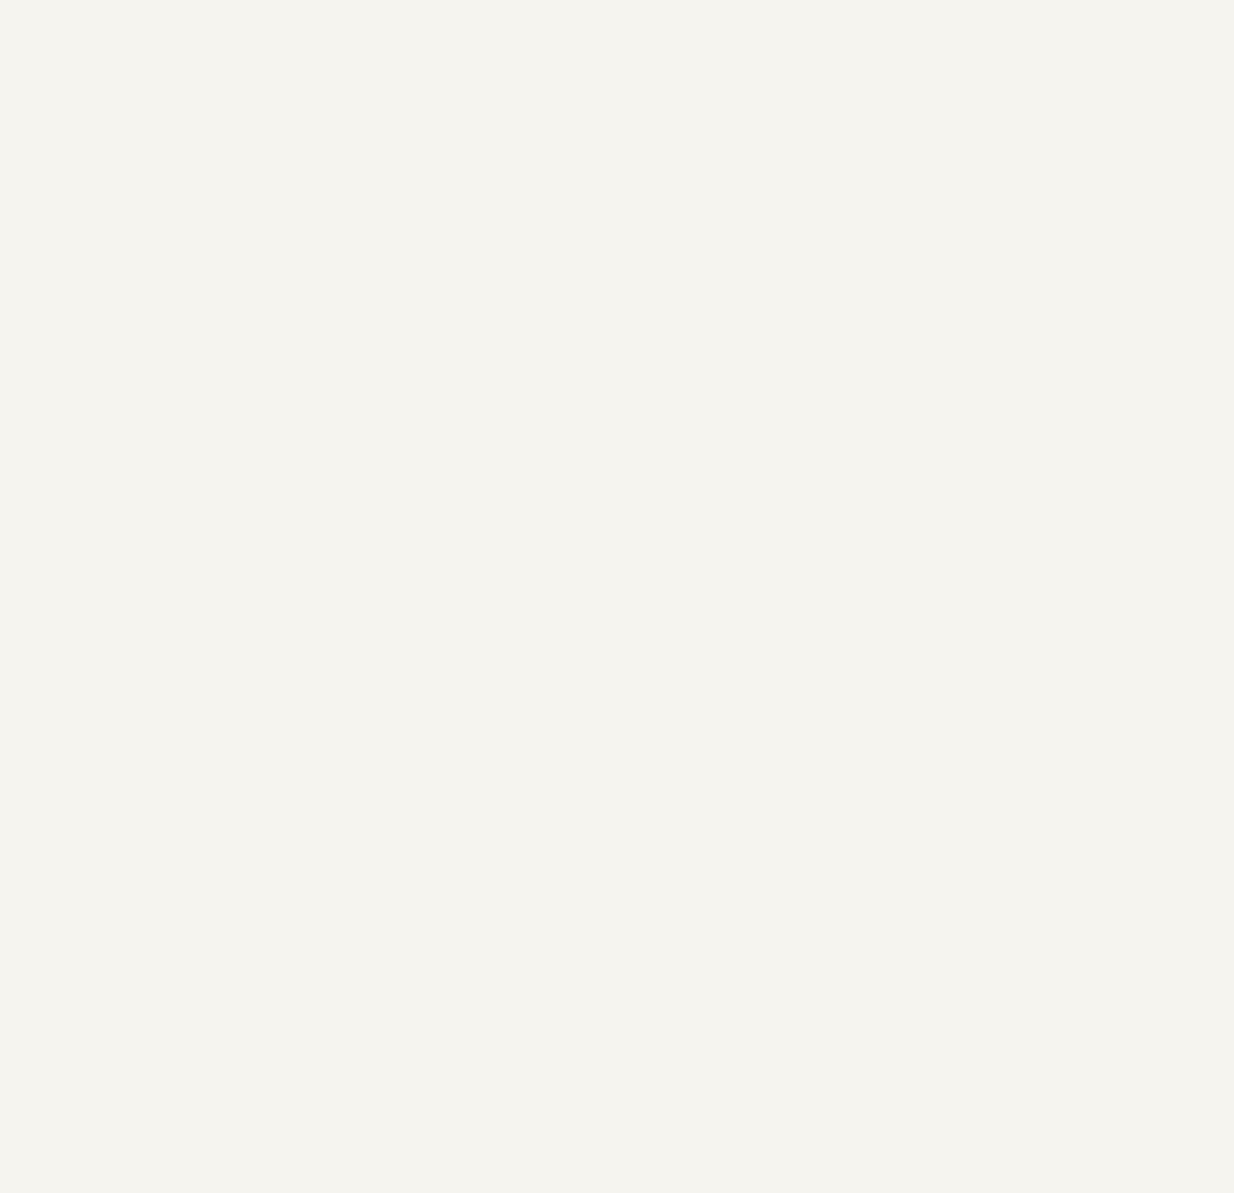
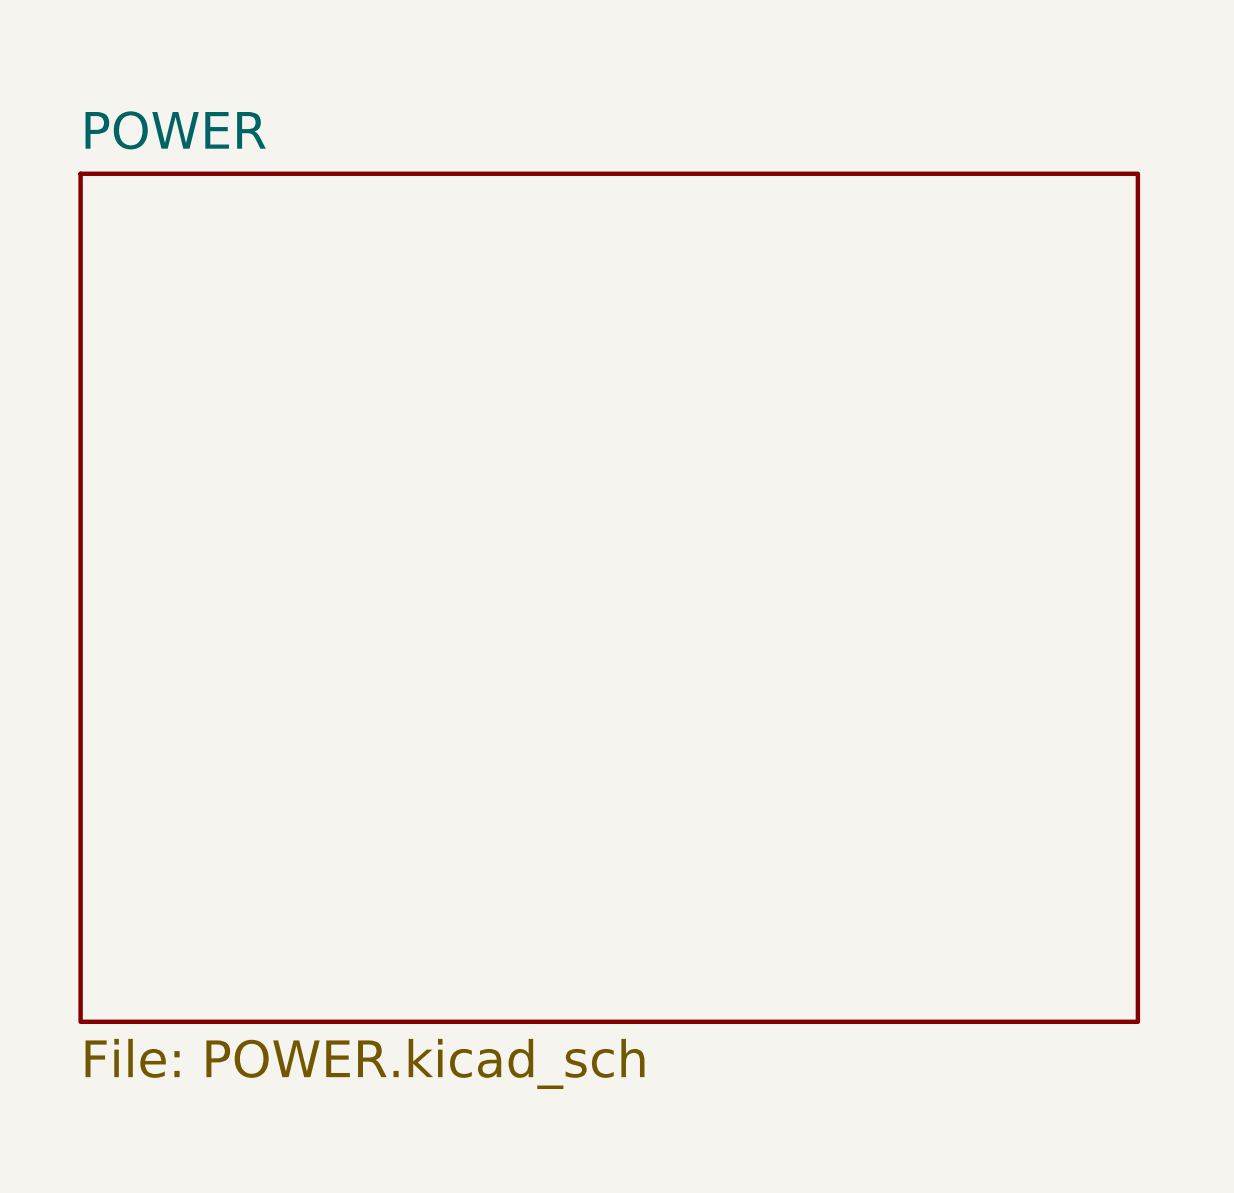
sheet POWER: none -> File: POWER.kicad_sch (609, 597)

